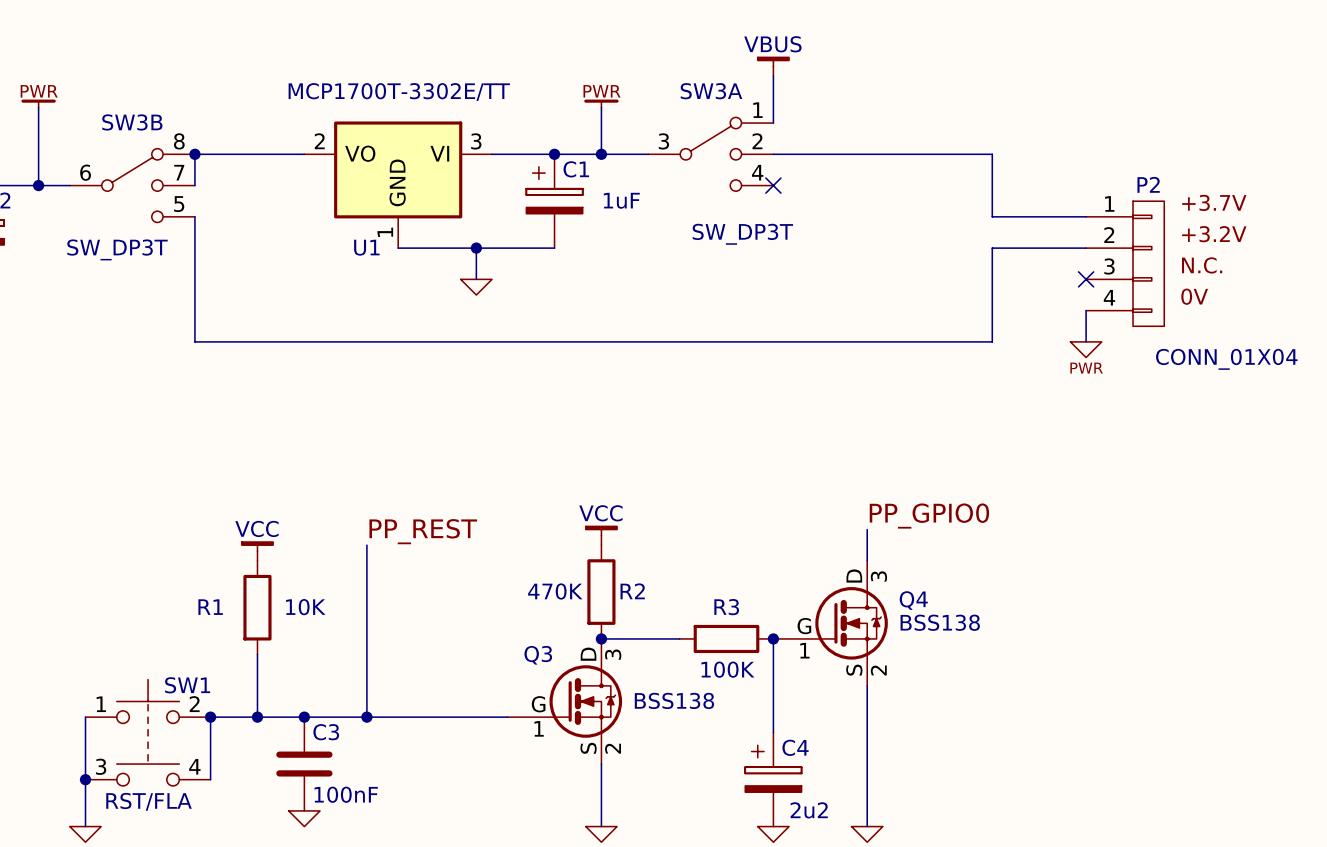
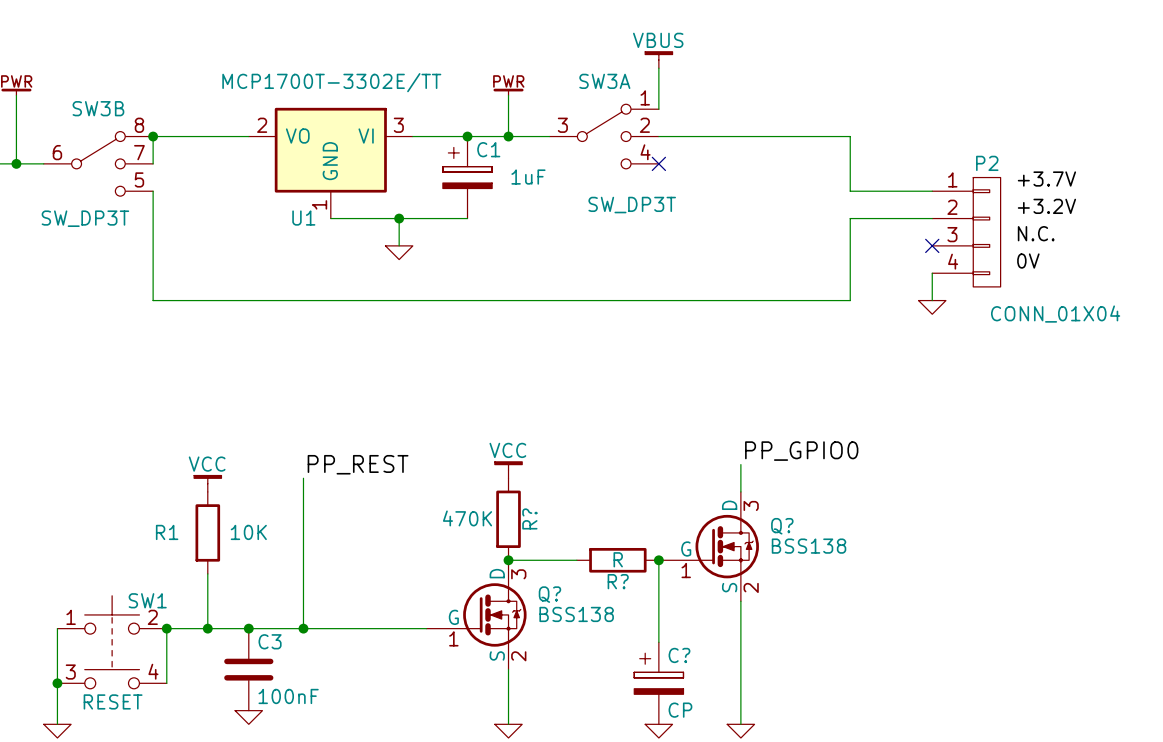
power symbol text: PWR (1086, 368) -> none
R2 name: R2 (632, 591) -> R? (529, 518)
Q4 name: Q4 (913, 600) -> Q? (782, 526)
R3 name: R3 (726, 607) -> R? (618, 581)
Q3 name: Q3 (538, 655) -> Q? (549, 594)
R3 value: 100K (727, 669) -> R (618, 559)
C4 name: C4 (795, 747) -> C? (679, 655)
SW1 value: RST/FLA (149, 801) -> RESET (113, 701)
C4 value: 2u2 (809, 810) -> CP (680, 710)

